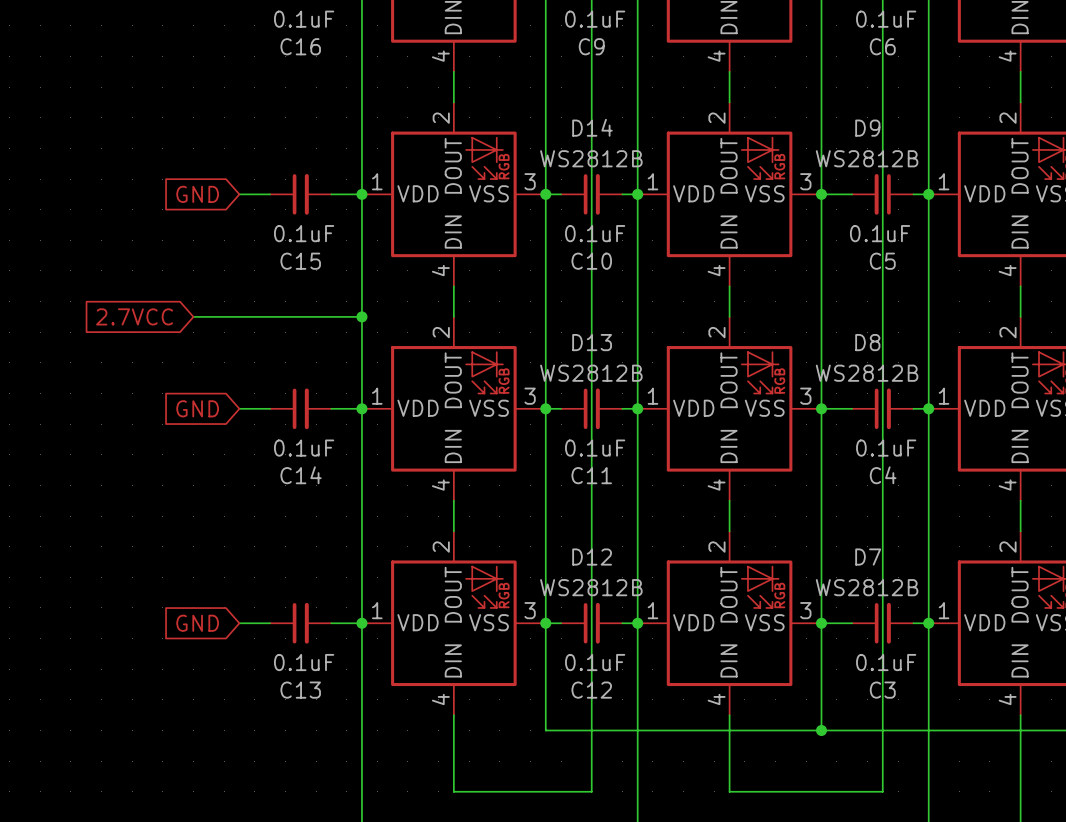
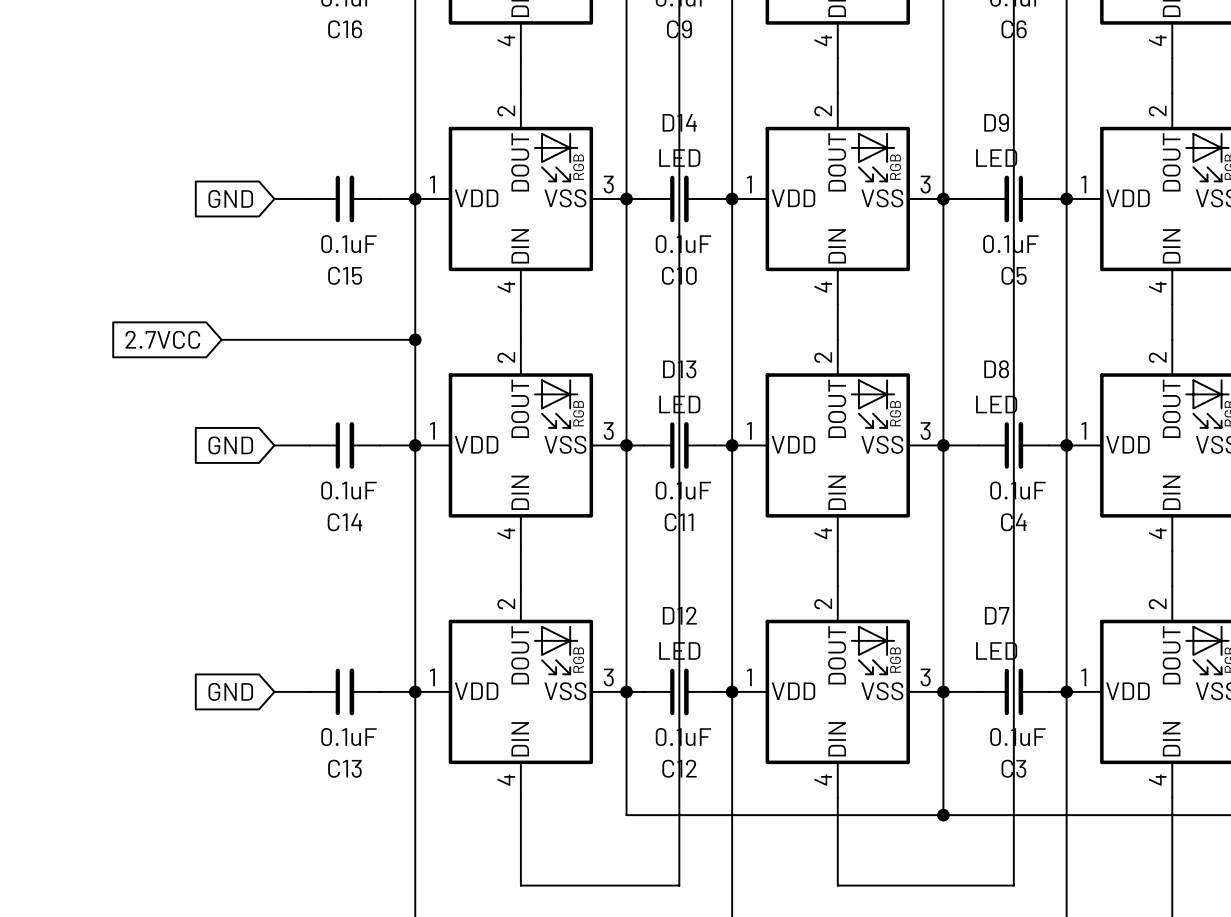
D14 value: WS2812B (591, 158) -> LED (679, 158)
D9 value: WS2812B (867, 158) -> LED (996, 158)
D13 value: WS2812B (591, 373) -> LED (679, 404)
D8 value: WS2812B (867, 373) -> LED (996, 404)
D12 value: WS2812B (591, 587) -> LED (679, 650)
D7 value: WS2812B (867, 587) -> LED (996, 650)

